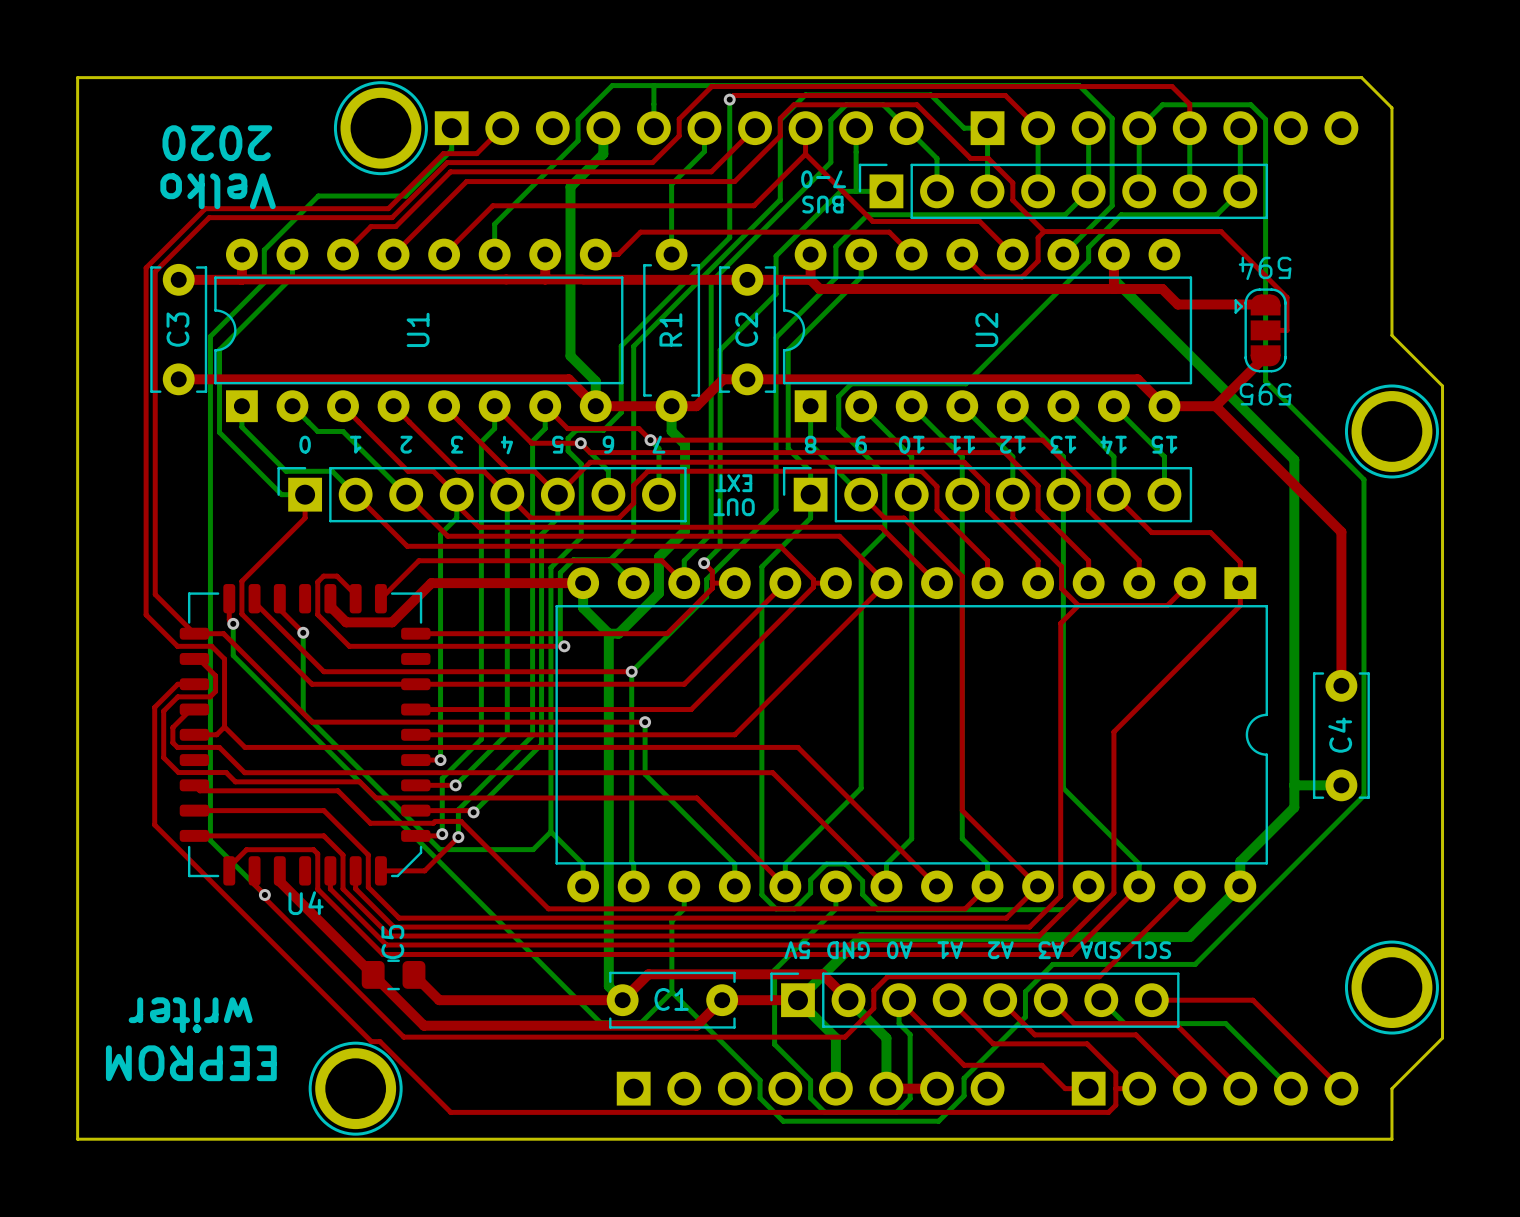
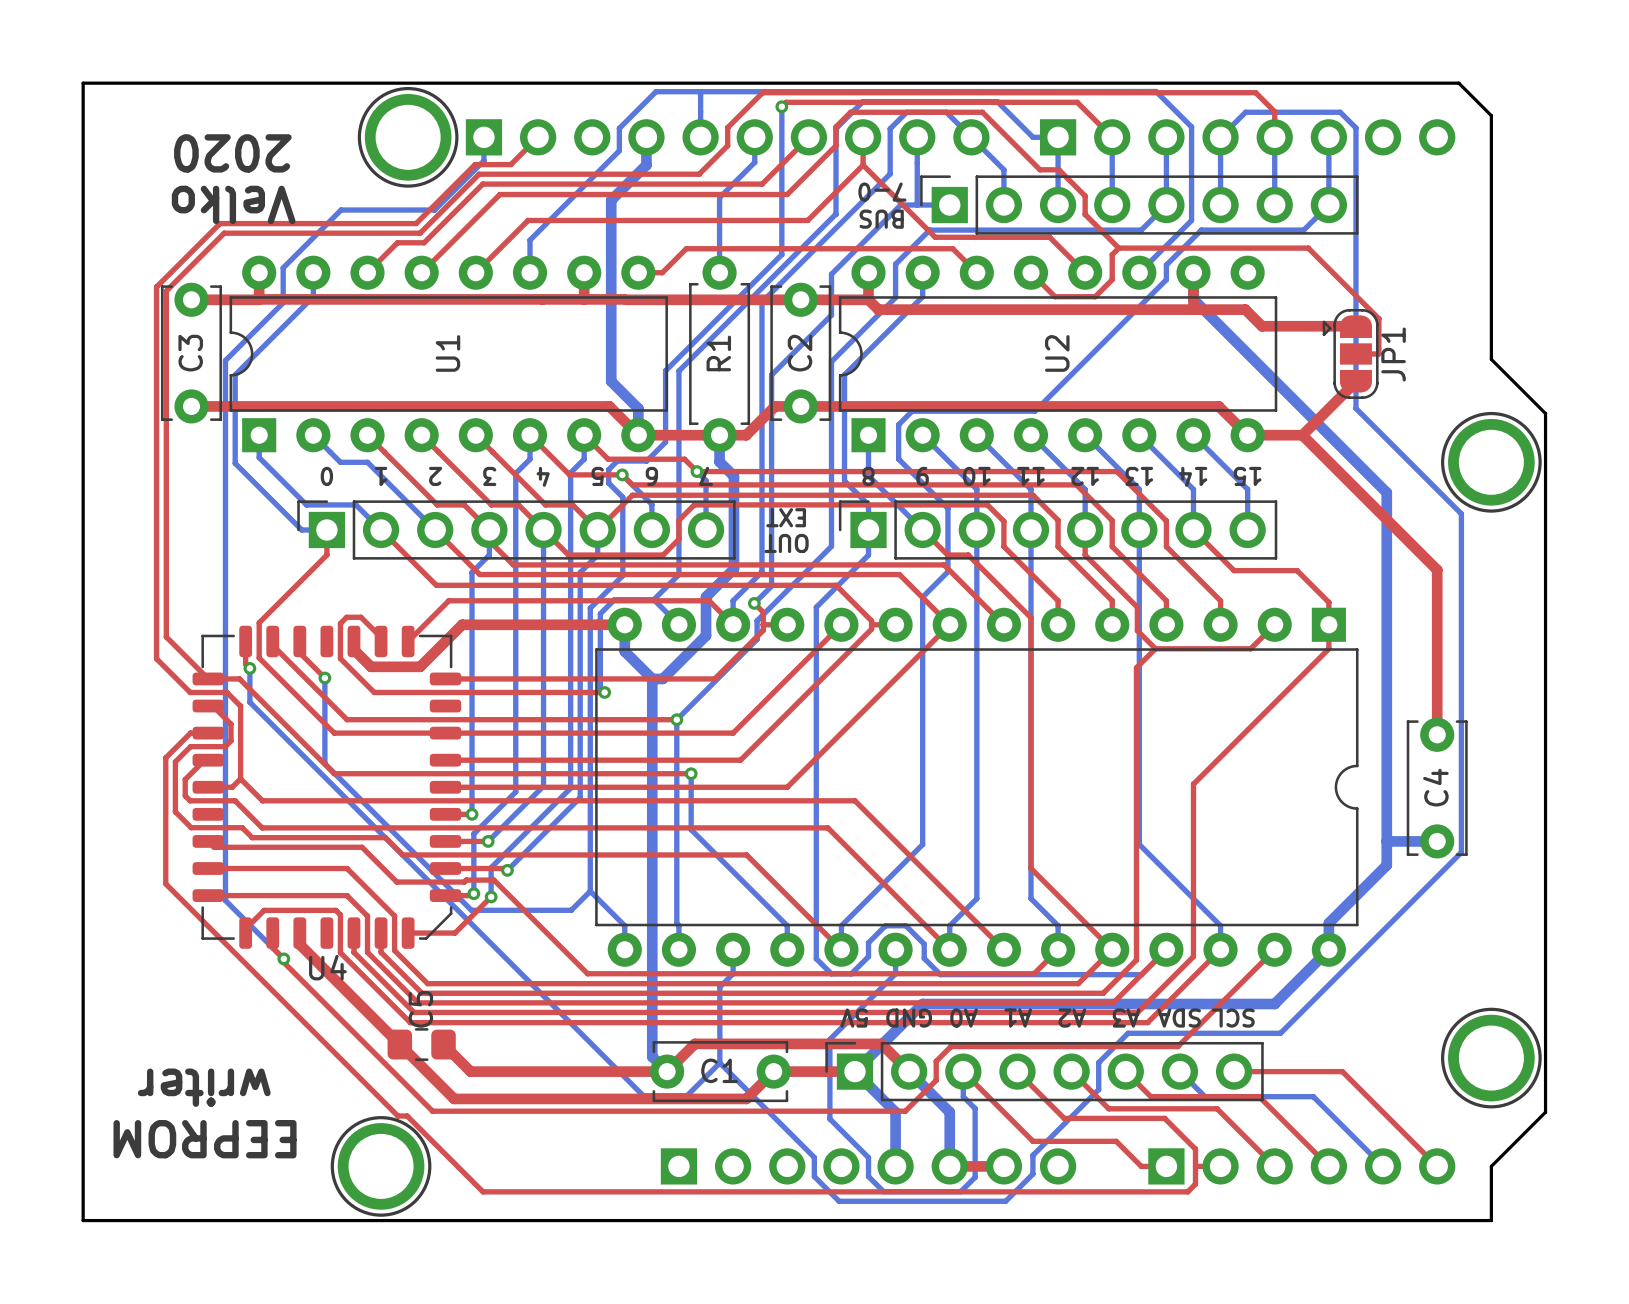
text: 594 (1265, 268) -> none
JP1 name: none -> JP1 (1393, 354)
text: 595 (1265, 394) -> none

